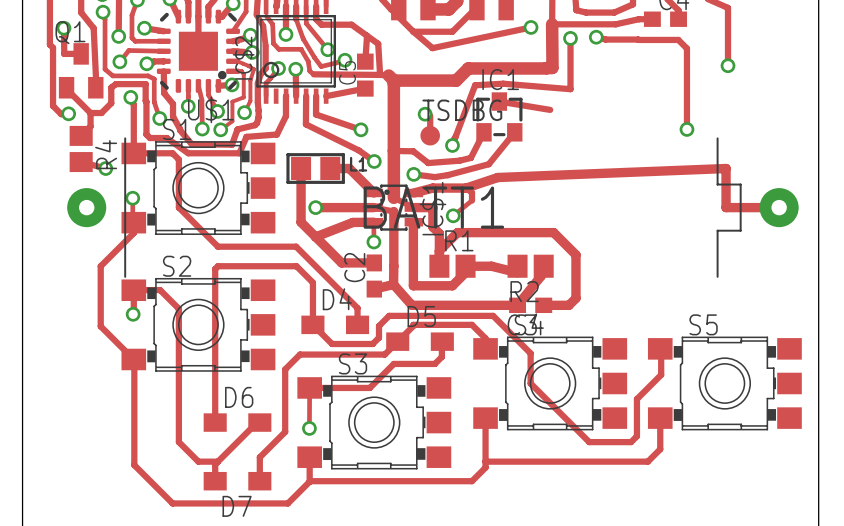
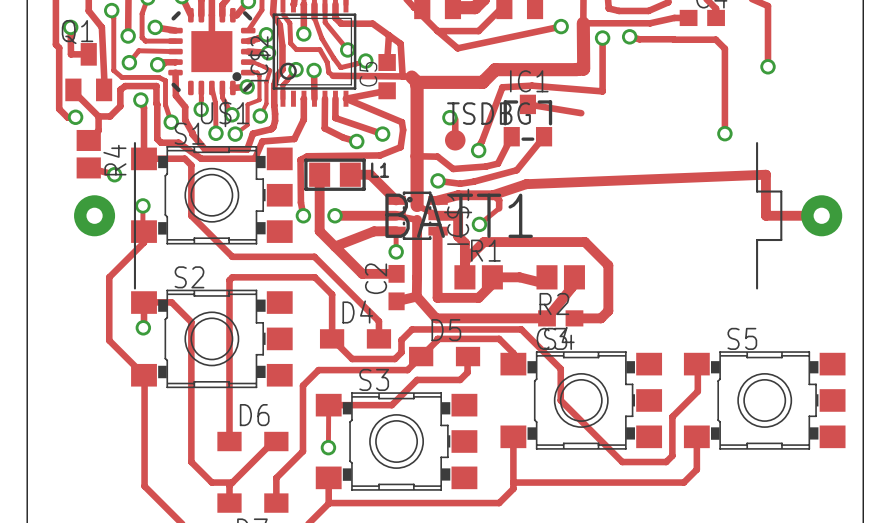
track: none -> (345, 98) (401, 122) (403, 129) (400, 147) (380, 155) (307, 156) (300, 159) (300, 202) (303, 215)
track: (305, 124) (359, 150) (374, 161) -> (324, 128) (343, 137) (356, 141)
via position: (374, 161) -> (356, 141)
via: none -> (303, 215)

